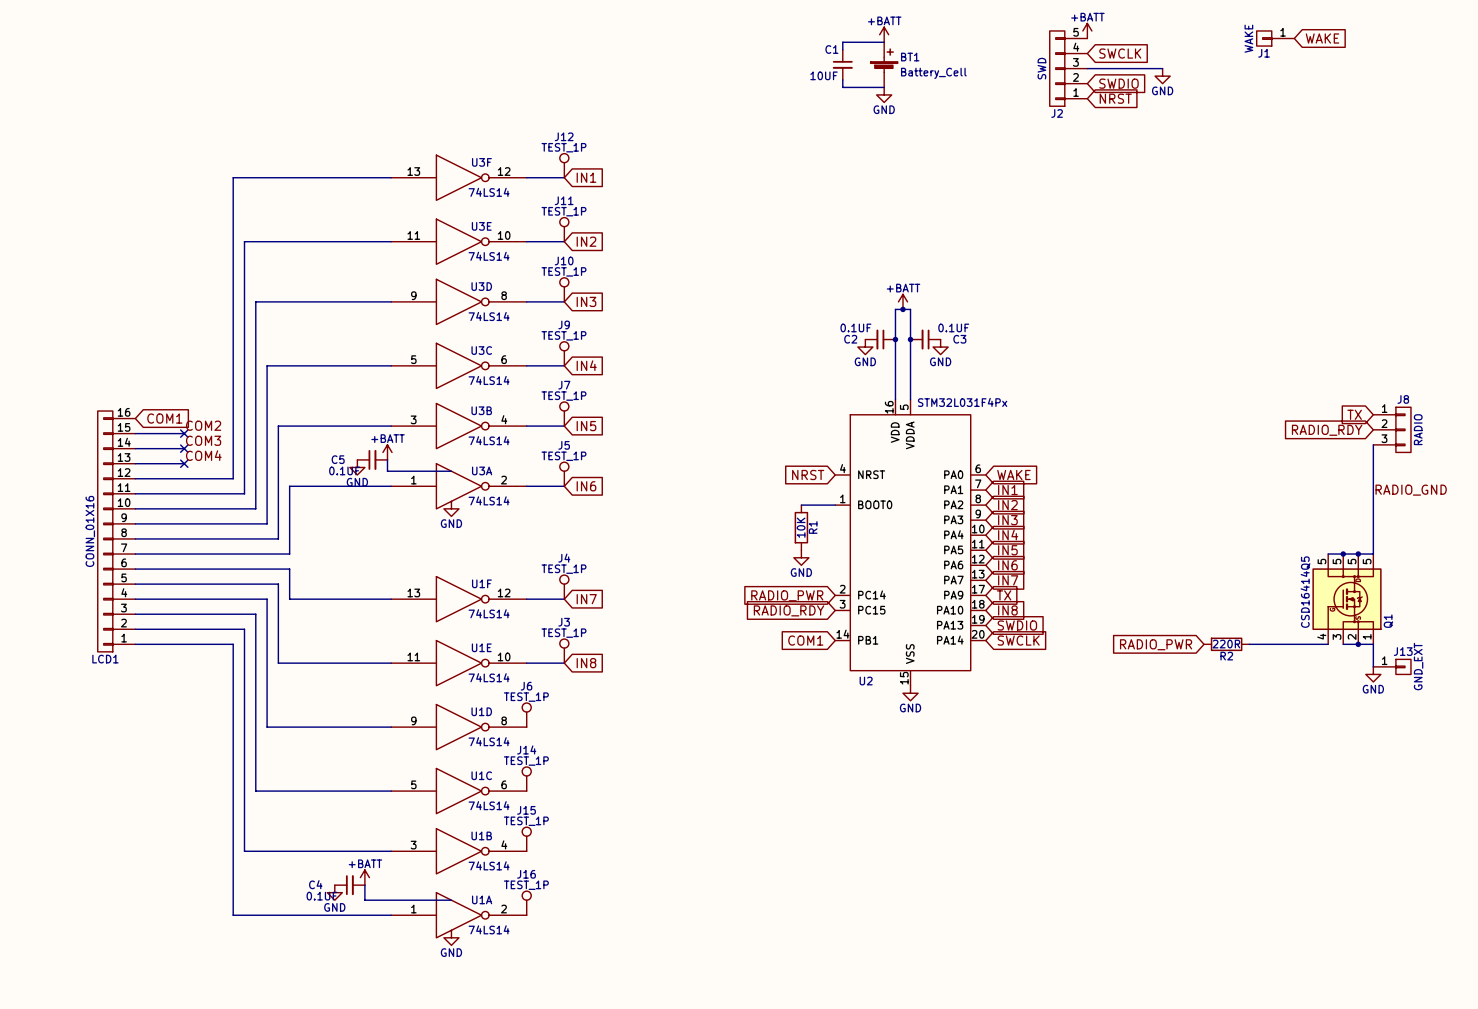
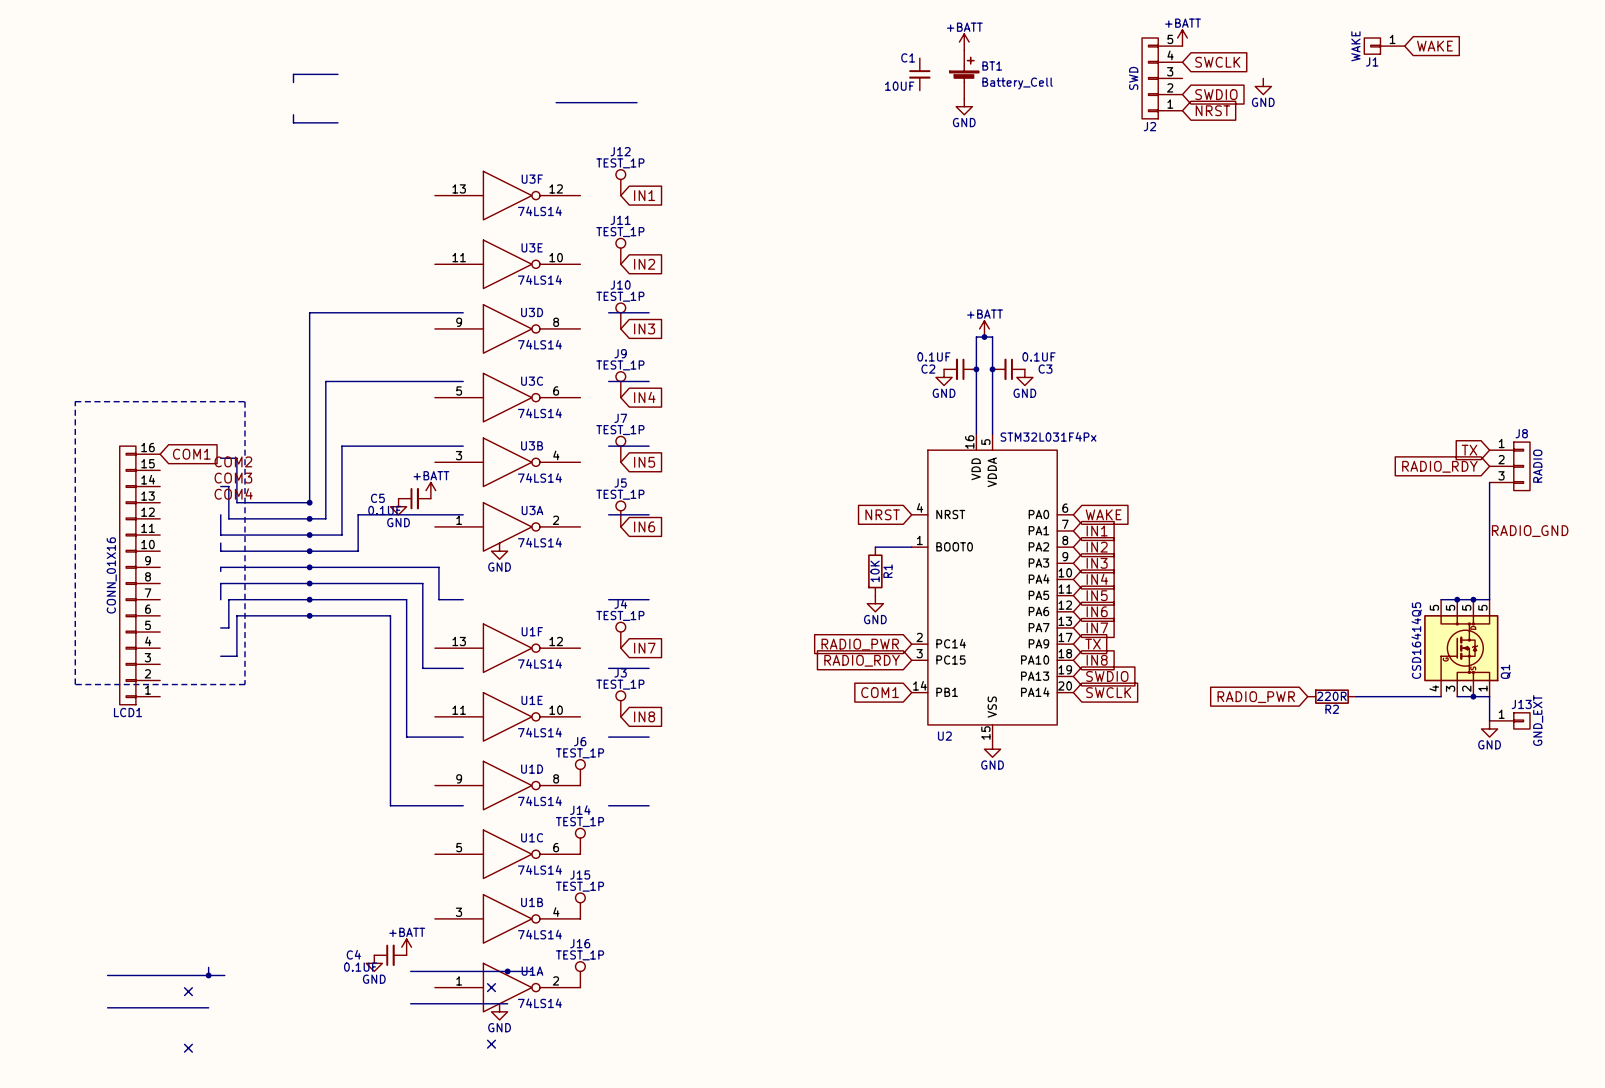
wire: (884, 42) (842, 42) (842, 49) -> none
wire: none -> (337, 74) (293, 74) (293, 82)
wire: (1087, 68) (1162, 68) -> none
wire: (842, 79) (842, 87) (884, 87) -> none
wire: none -> (556, 102) (636, 102)
wire: none -> (293, 114) (293, 122) (337, 122)
wire: (391, 177) (233, 177) (233, 478) -> (463, 381) (325, 381) (325, 518) (265, 518)
wire: (526, 177) (564, 177) -> (608, 312) (649, 312)
wire: (391, 241) (244, 241) (244, 493) -> (463, 446) (341, 446) (341, 535) (277, 535)
wire: (526, 241) (564, 241) -> (608, 381) (649, 381)
wire: none -> (463, 312) (309, 312) (309, 502) (236, 502) (236, 458) (220, 458)
wire: (391, 301) (255, 301) (255, 508) -> (463, 514) (358, 514) (358, 551) (289, 551)
wire: (526, 301) (564, 301) -> (608, 446) (649, 446)
wire: (391, 365) (267, 365) (267, 523) -> (463, 599) (438, 599) (438, 567) (301, 567)
wire: (526, 365) (564, 365) -> (608, 514) (649, 514)
line: none -> (75, 401) (75, 684) (245, 684) (245, 401) (75, 401)
wire: (391, 426) (278, 426) (278, 538) -> (463, 668) (422, 668) (422, 583) (313, 583)
wire: (526, 426) (564, 426) -> none
wire: (135, 433) (184, 433) -> none
no-connect mark: (184, 433) -> none
wire: (135, 448) (184, 448) -> none
no-connect mark: (184, 448) -> none
wire: (387, 459) (387, 471) (451, 471) -> none
wire: (135, 463) (184, 463) -> none
no-connect mark: (184, 463) -> none
junction: none -> (309, 502)
wire: (135, 478) (199, 478) -> (220, 486) (228, 486) (228, 518)
junction: none -> (309, 518)
wire: (391, 486) (289, 486) (289, 554) -> (463, 737) (406, 737) (406, 599) (325, 599)
wire: (526, 486) (564, 486) -> (608, 599) (649, 599)
wire: (135, 493) (191, 493) -> (220, 514) (220, 535)
junction: none -> (309, 535)
wire: (135, 508) (191, 508) -> (220, 543) (220, 551)
junction: none -> (309, 551)
wire: (135, 523) (191, 523) -> (220, 571) (220, 567)
junction: none -> (309, 567)
wire: (135, 538) (191, 538) -> (220, 599) (220, 583)
junction: none -> (309, 583)
wire: (135, 554) (199, 554) -> (220, 627) (228, 627) (228, 599)
junction: none -> (309, 599)
wire: (135, 569) (206, 569) -> (220, 656) (236, 656) (236, 615)
junction: none -> (309, 615)
wire: (289, 569) (289, 599) (391, 599) -> (325, 615) (390, 615) (390, 805) (463, 805)
wire: (135, 584) (278, 584) (278, 663) (391, 663) -> none
wire: (135, 599) (267, 599) (267, 727) (391, 727) -> none
wire: (526, 599) (564, 599) -> (608, 668) (649, 668)
wire: (135, 614) (255, 614) (255, 791) (391, 791) -> none
wire: (135, 629) (244, 629) (244, 851) (391, 851) -> none
wire: (135, 644) (233, 644) (233, 915) (391, 915) -> none
wire: (526, 663) (564, 663) -> (608, 737) (649, 737)
wire: none -> (608, 805) (649, 805)
wire: (364, 885) (364, 900) (368, 900) -> none
wire: none -> (208, 967) (208, 975)
wire: none -> (499, 971) (531, 971)
junction: none -> (507, 971)
wire: none -> (107, 975) (224, 975)
junction: none -> (208, 975)
no-connect mark: none -> (491, 987)
no-connect mark: none -> (188, 991)
wire: none -> (410, 1003) (507, 1003)
wire: none -> (107, 1007) (208, 1007)
no-connect mark: none -> (491, 1044)
no-connect mark: none -> (188, 1048)

